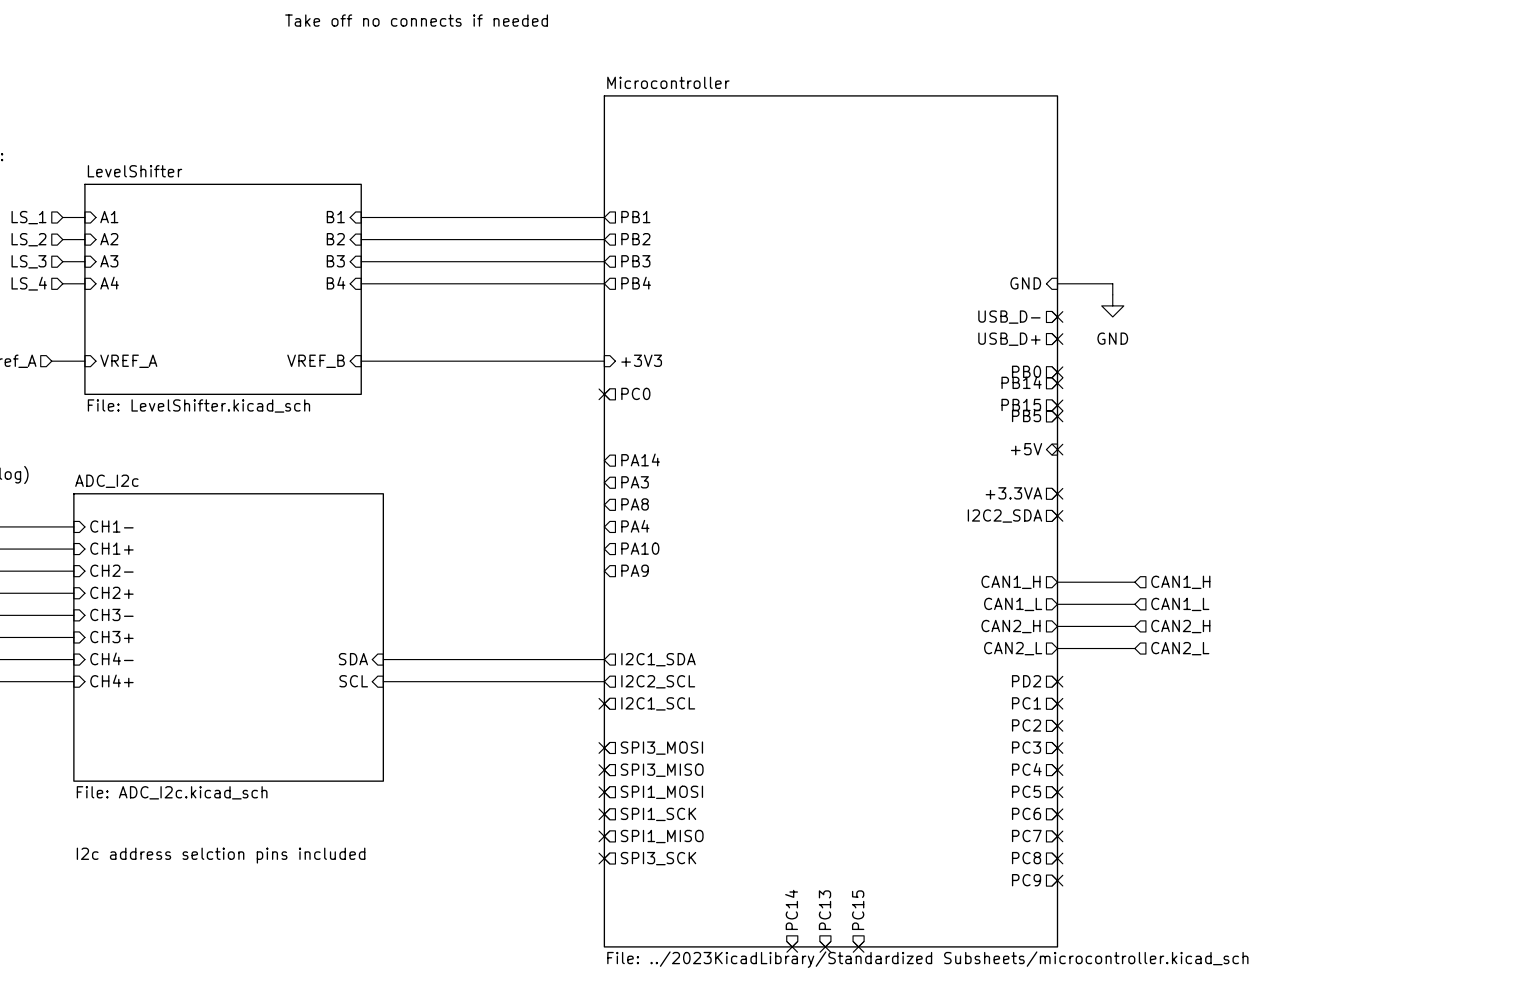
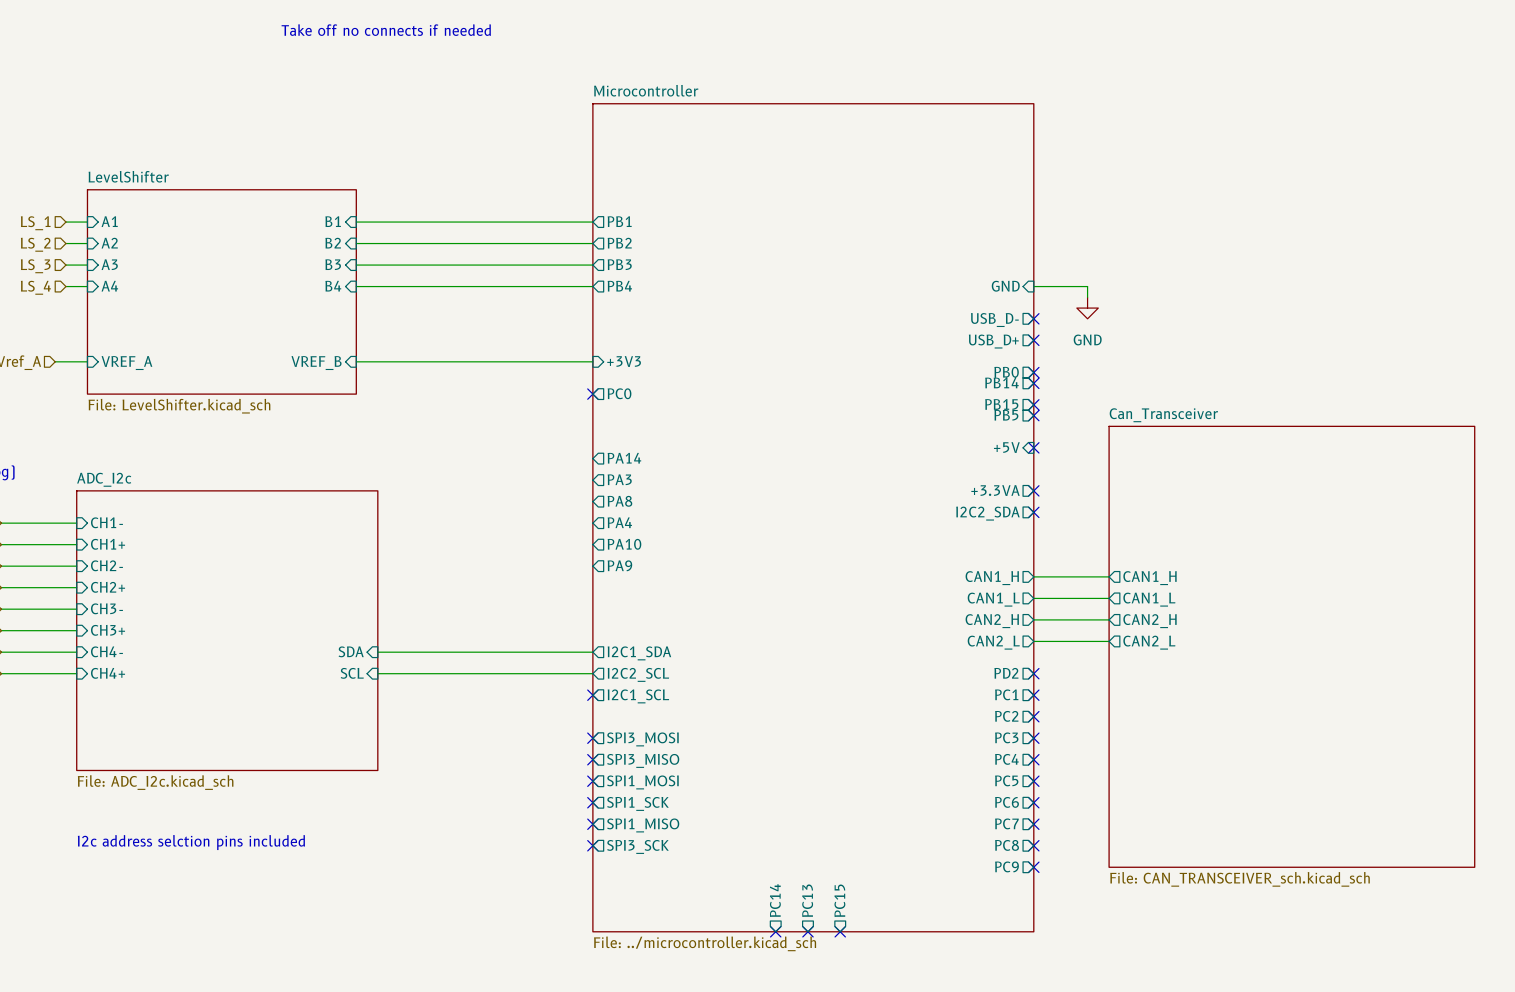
hierarchical label: CAN1_H (1180, 582) -> none
sheet pin: none -> CAN1_H (1150, 578)
hierarchical label: CAN1_L (1180, 604) -> none
sheet pin: none -> CAN1_L (1149, 599)
hierarchical label: CAN2_H (1180, 626) -> none
sheet pin: none -> CAN2_H (1150, 621)
hierarchical label: CAN2_L (1180, 648) -> none
sheet pin: none -> CAN2_L (1149, 642)
sheet Can_Transceiver: none -> File: CAN_TRANSCEIVER_sch.kicad_sch (1291, 646)
sheet Microcontroller value: File: ../2023KicadLibrary/Standardized Subsheets/microcontroller.kicad_sch (927, 959) -> File: ../microcontroller.kicad_sch (705, 943)

